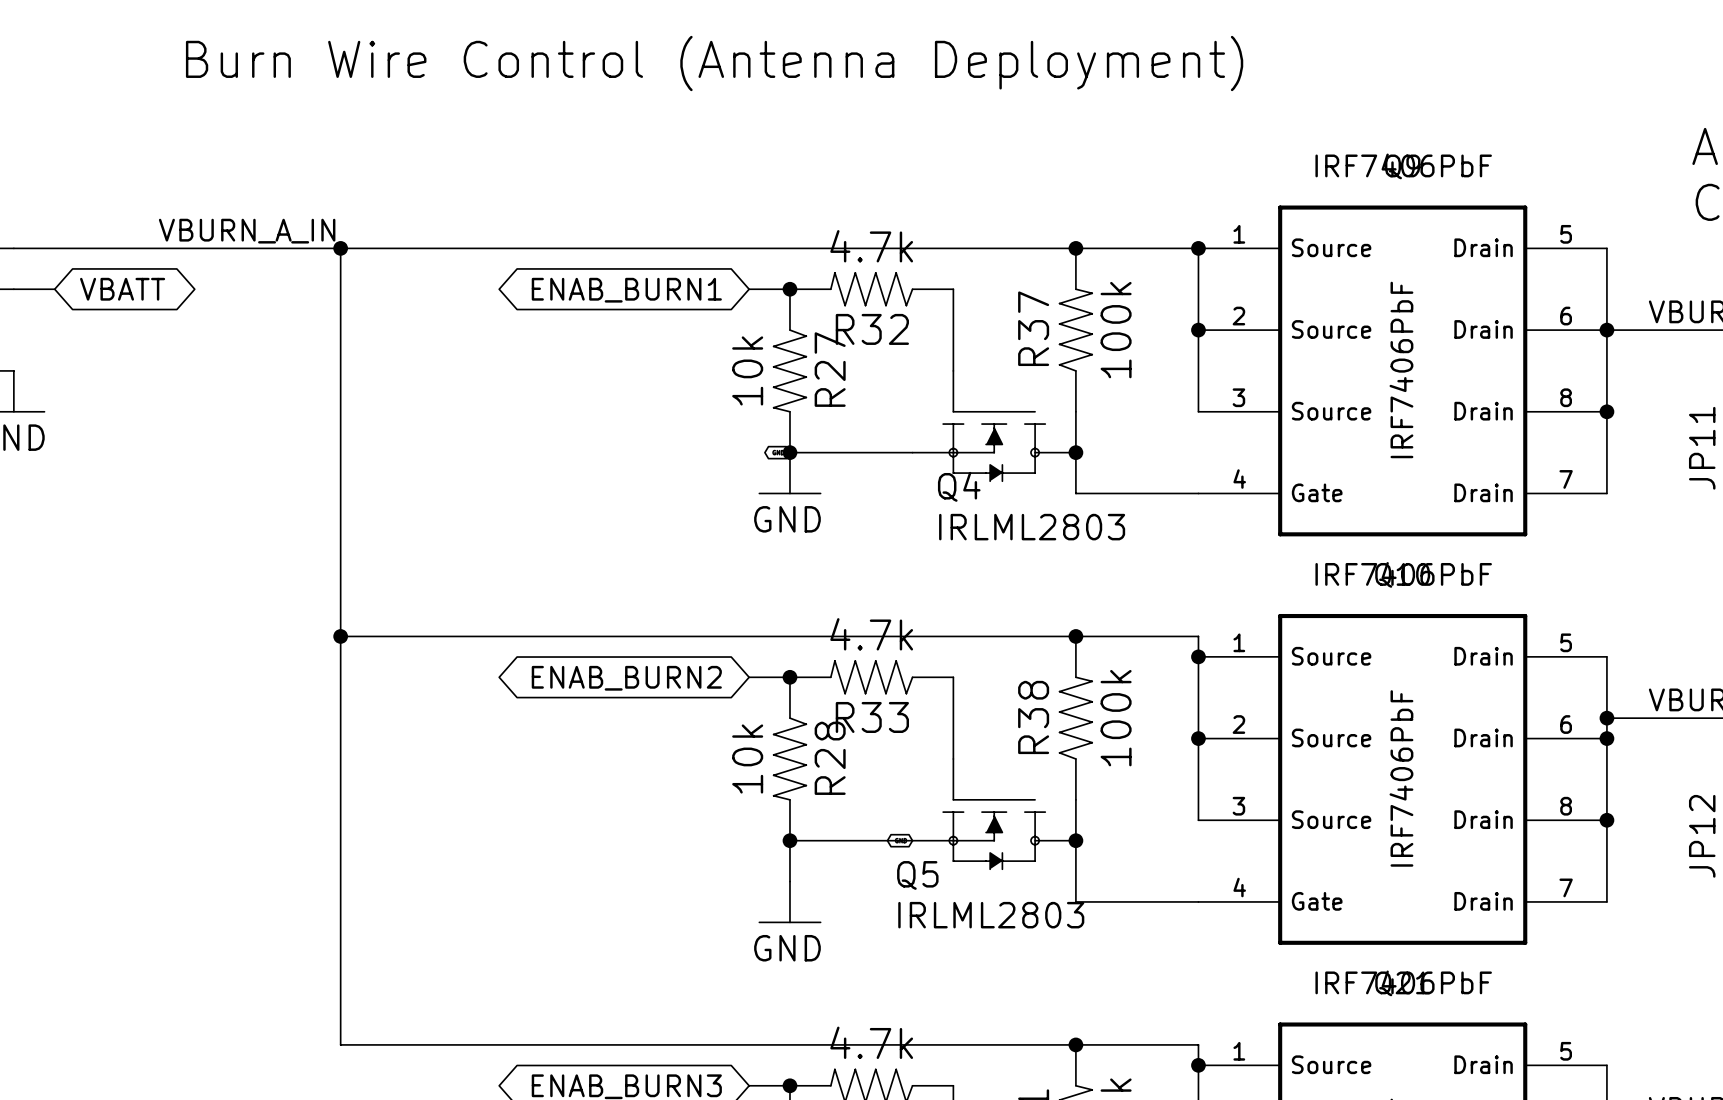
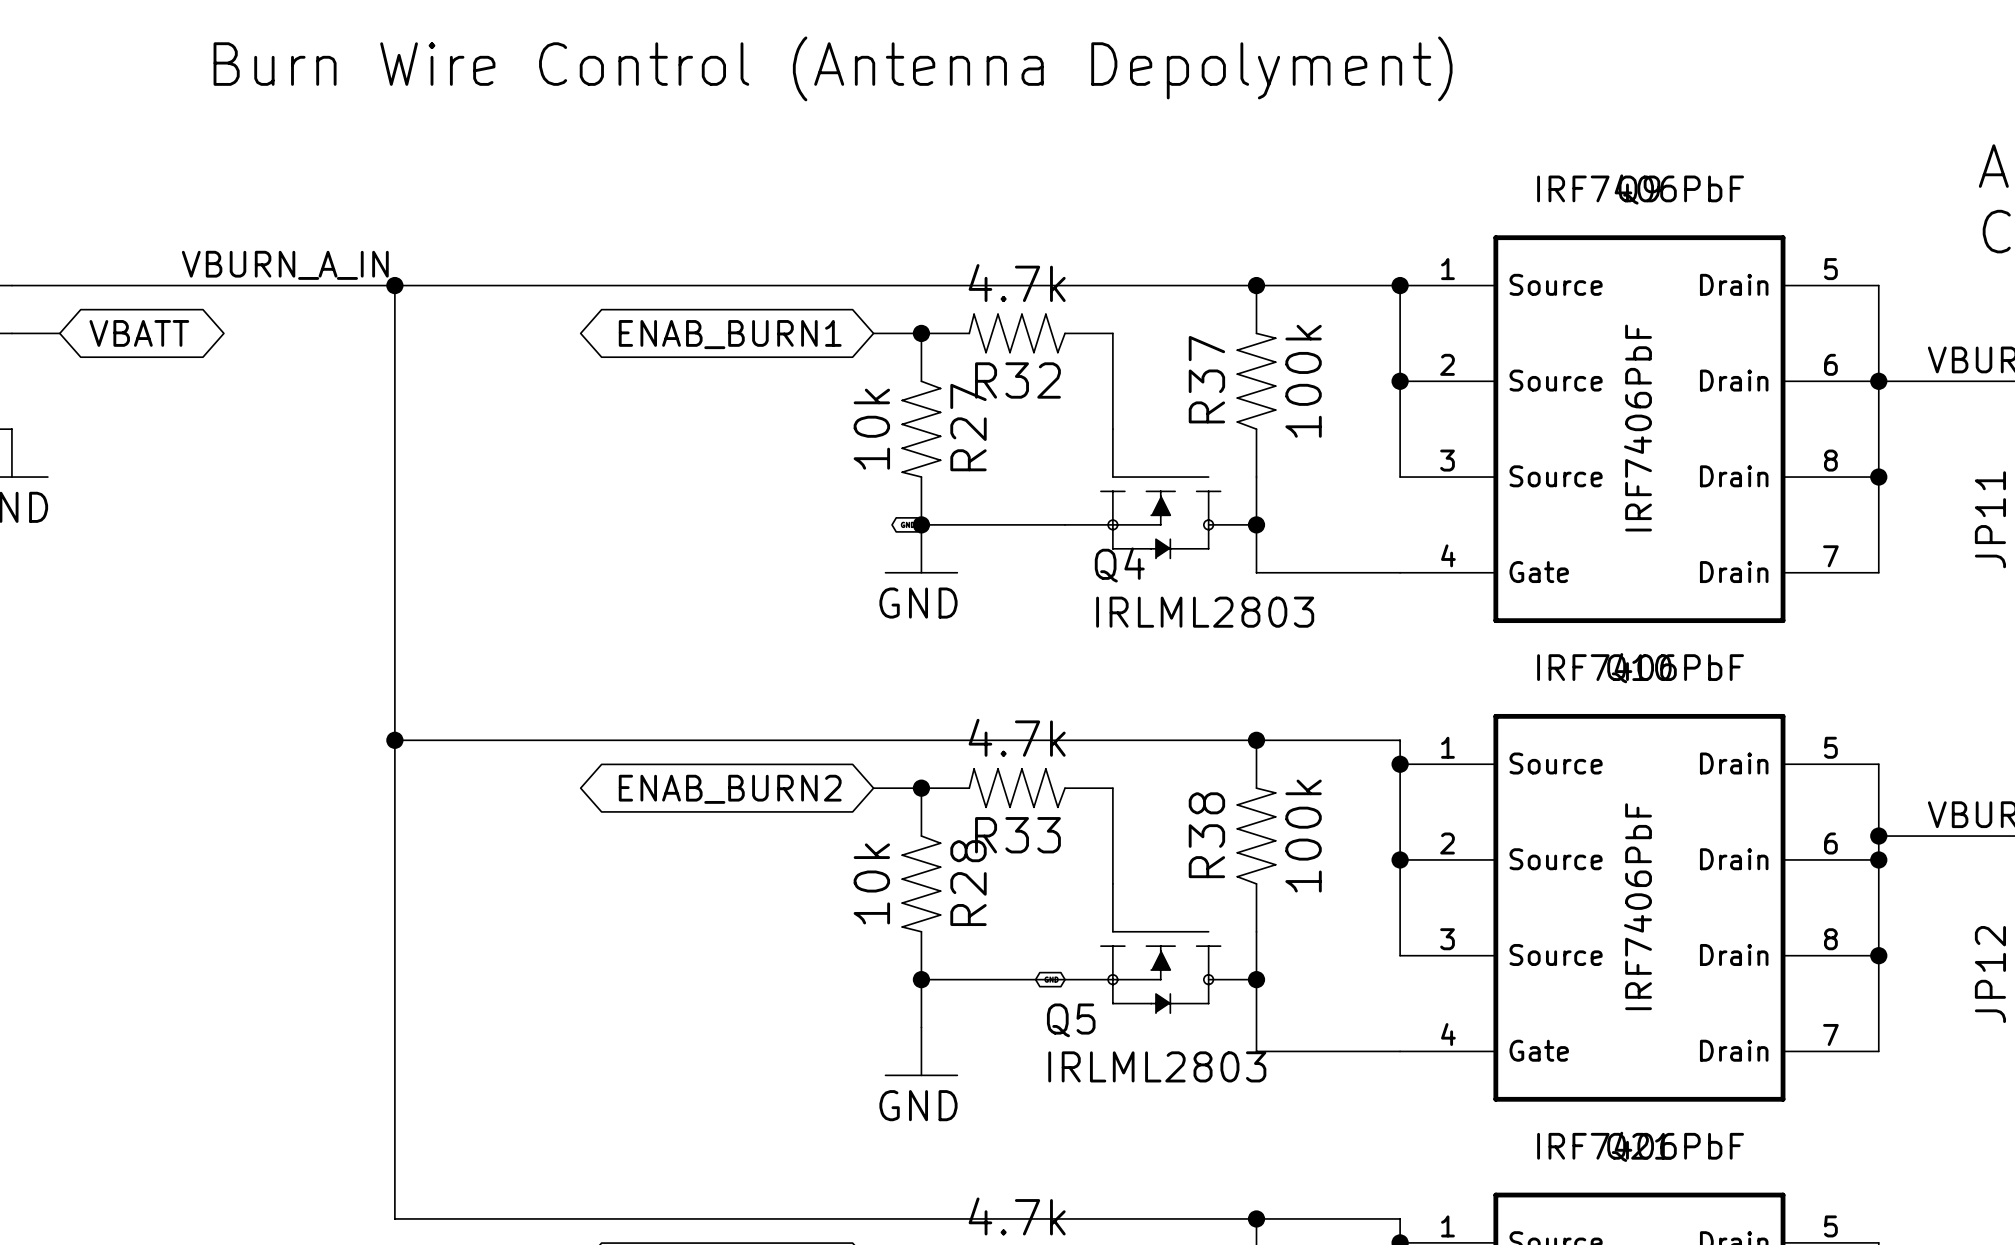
text: Burn Wire Control (Antenna Deployment) (714, 63) -> Burn Wire Control (Antenna Depolyment) (833, 68)

